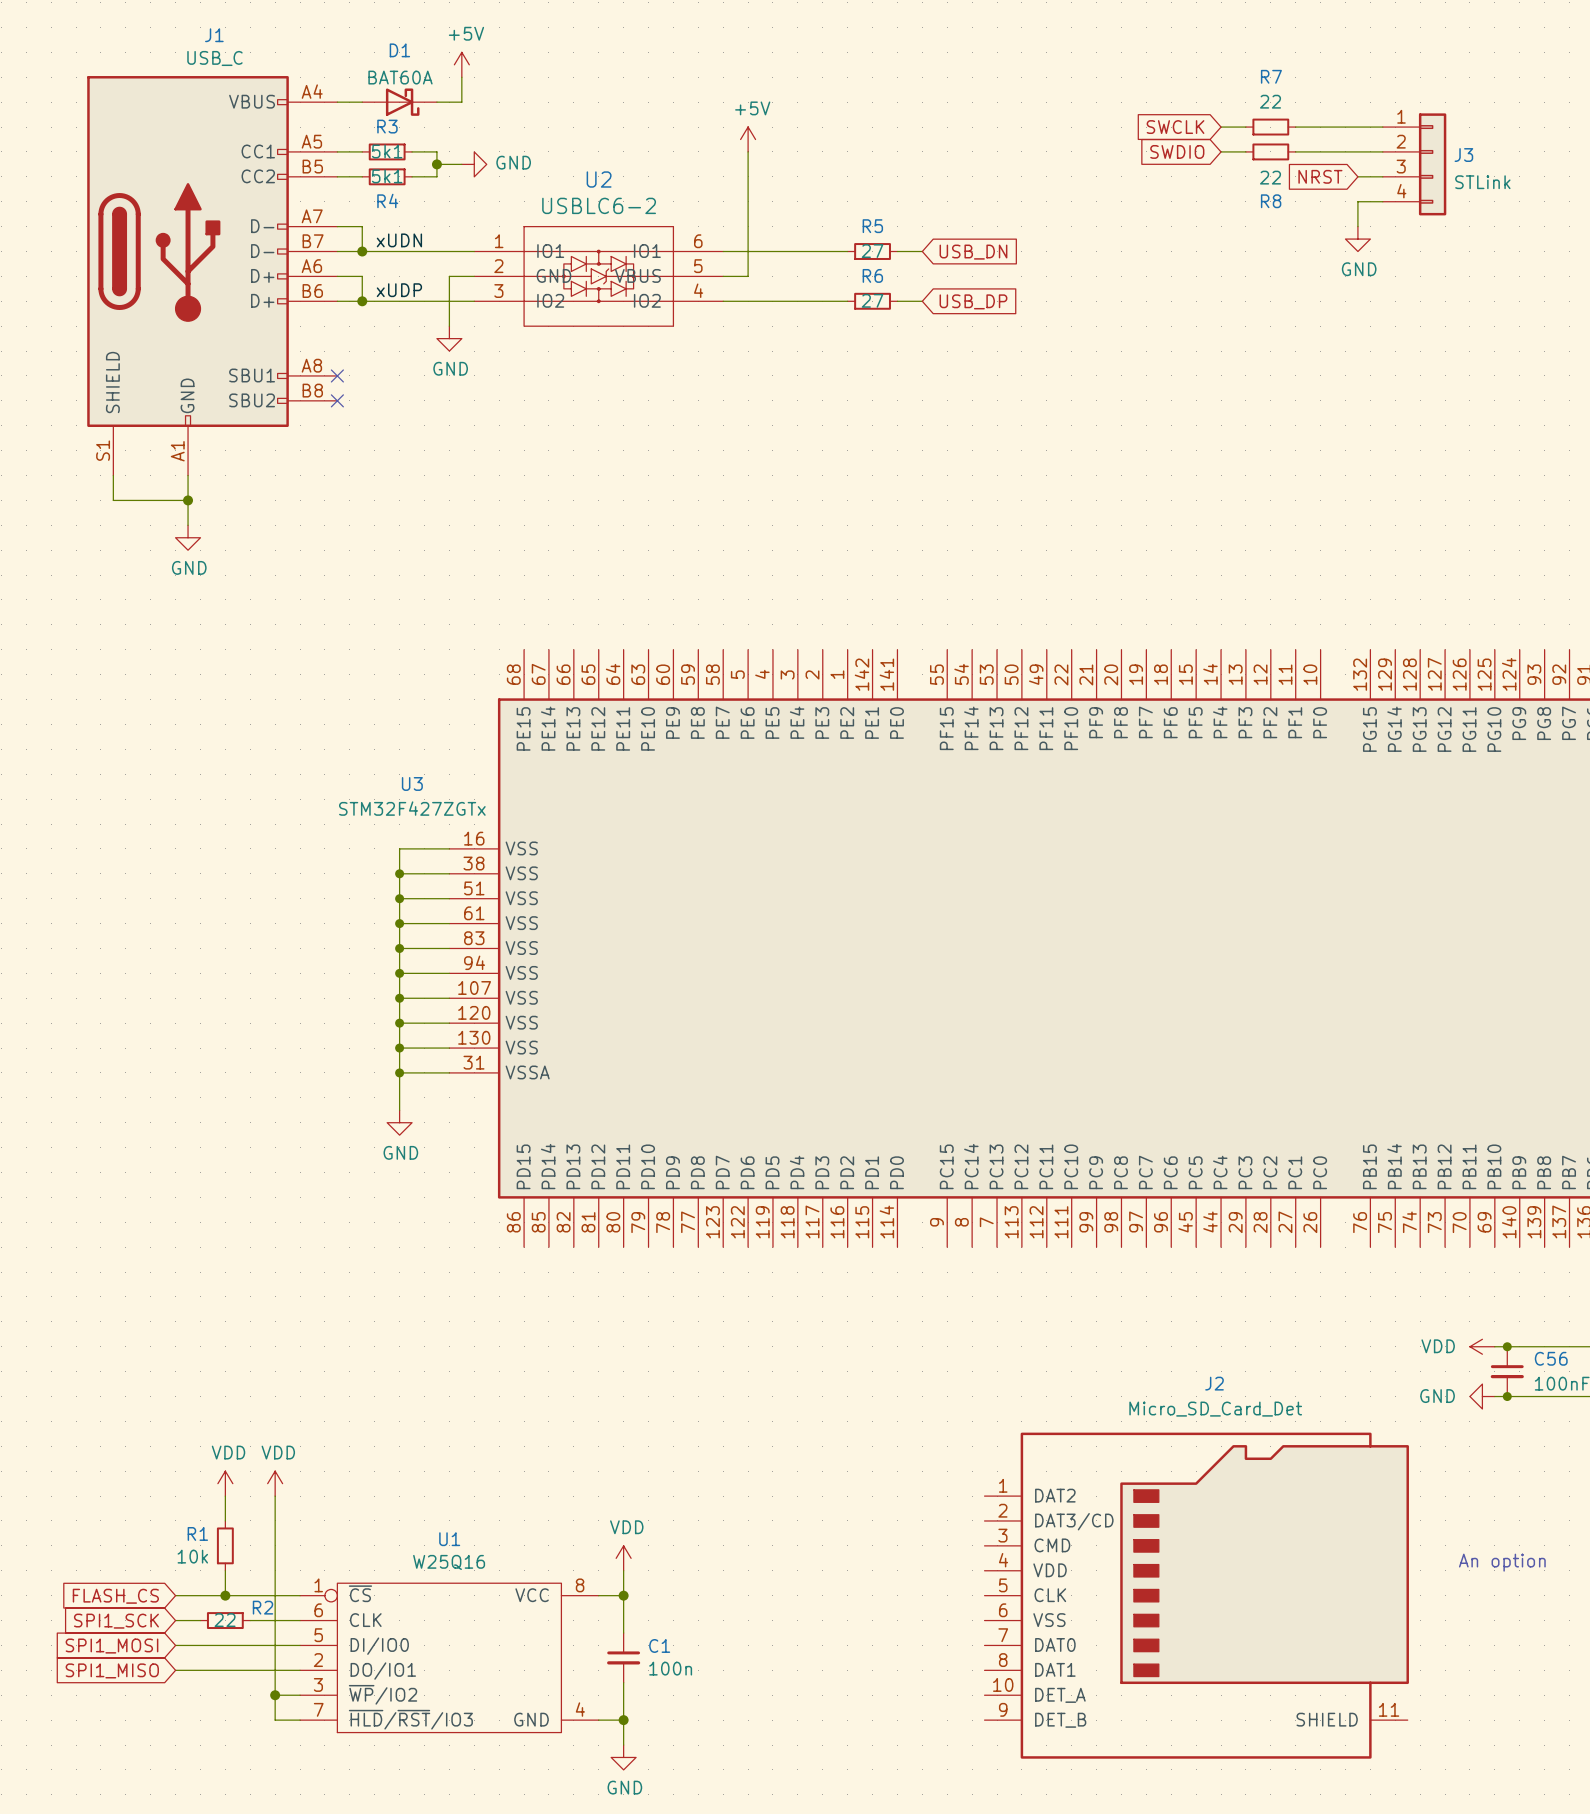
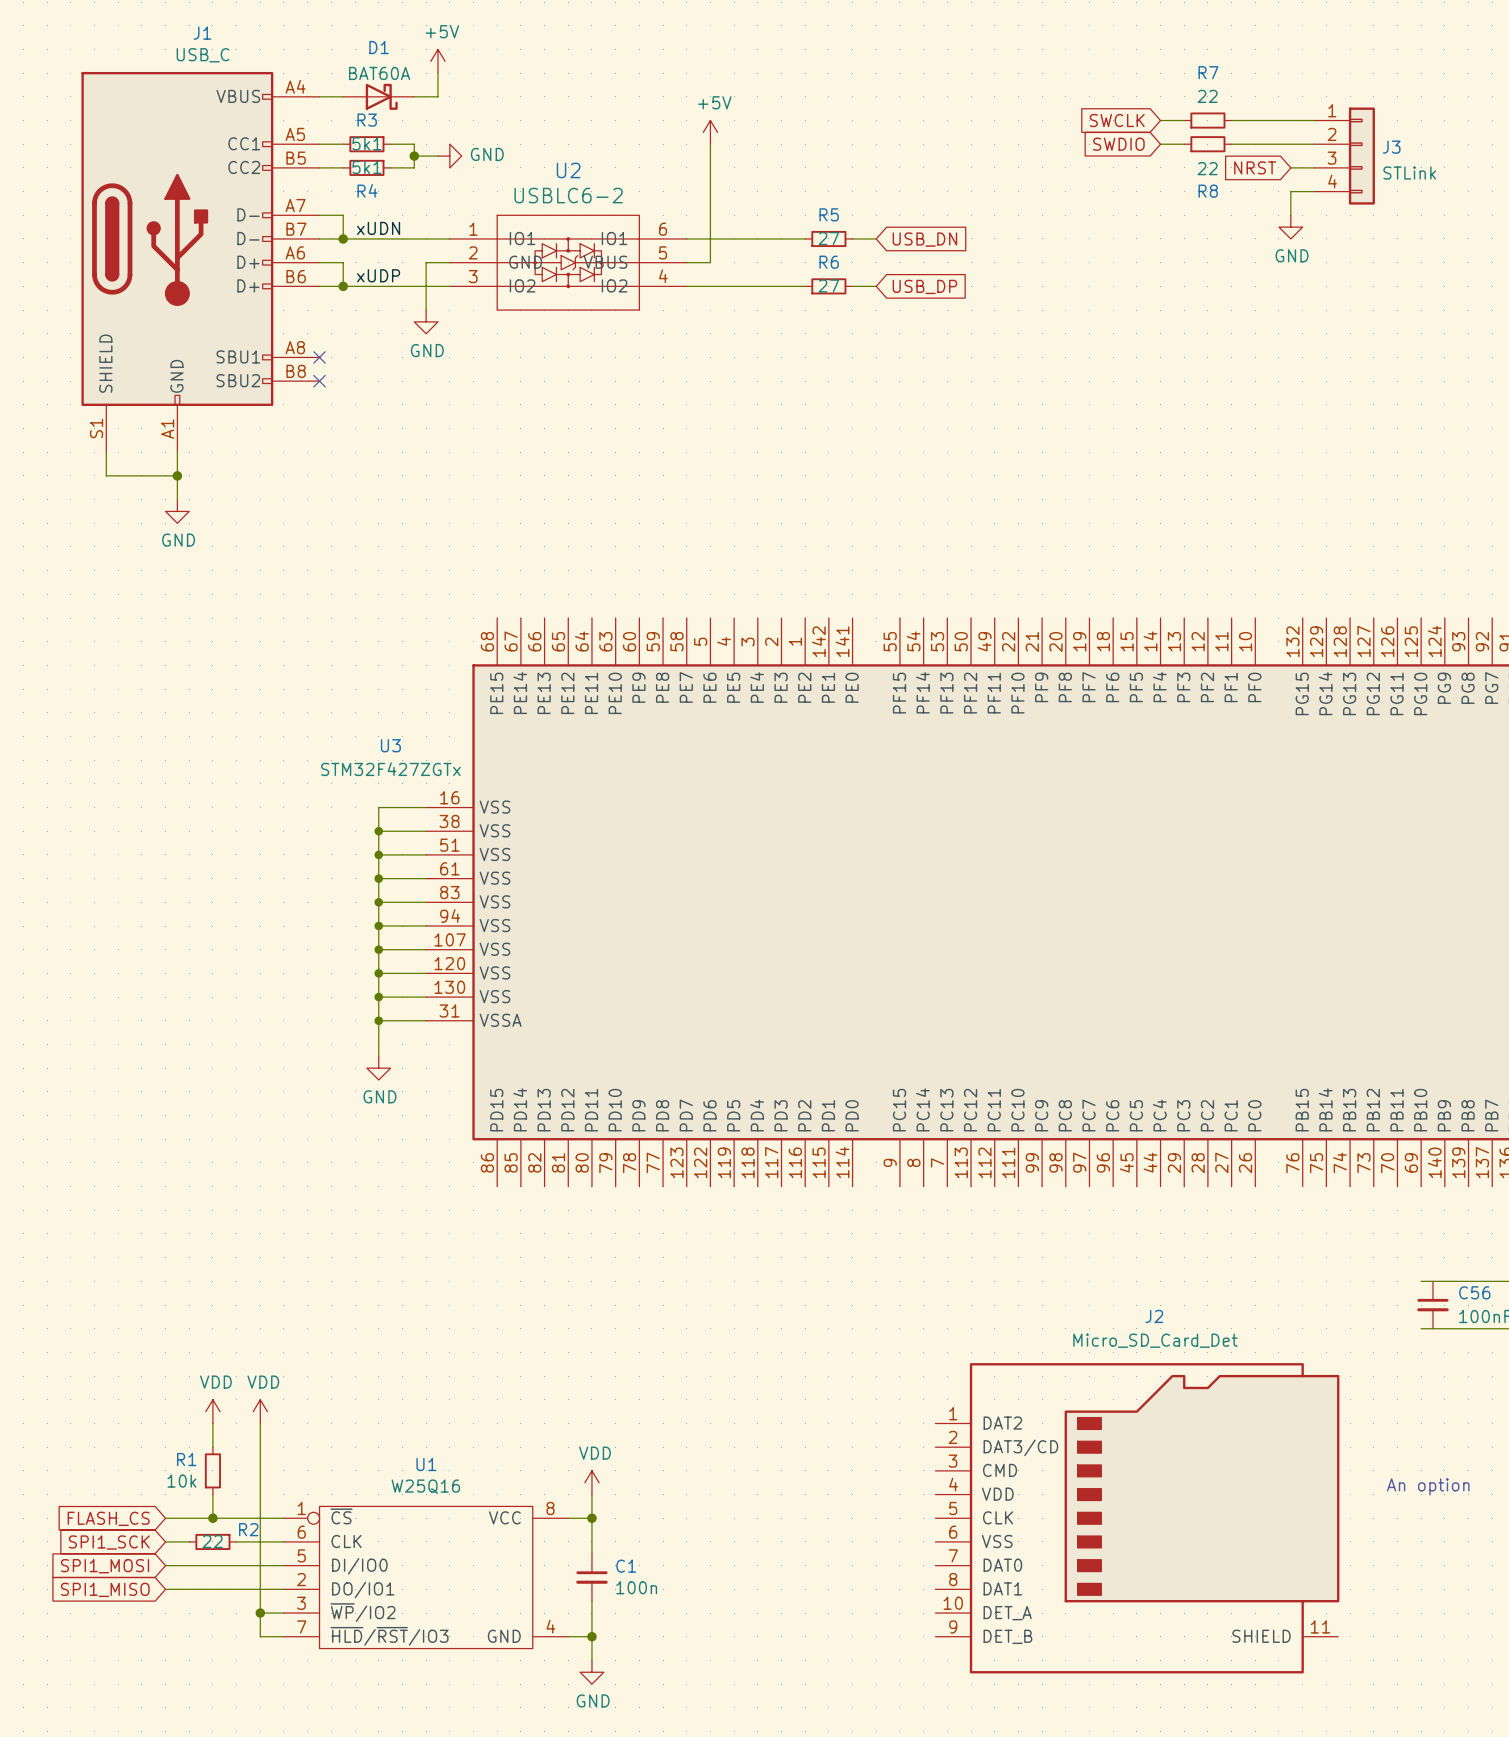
power symbol: VDD (1482, 1346) -> none
junction: (1507, 1346) -> none
power symbol: GND (1482, 1396) -> none
junction: (1507, 1396) -> none

